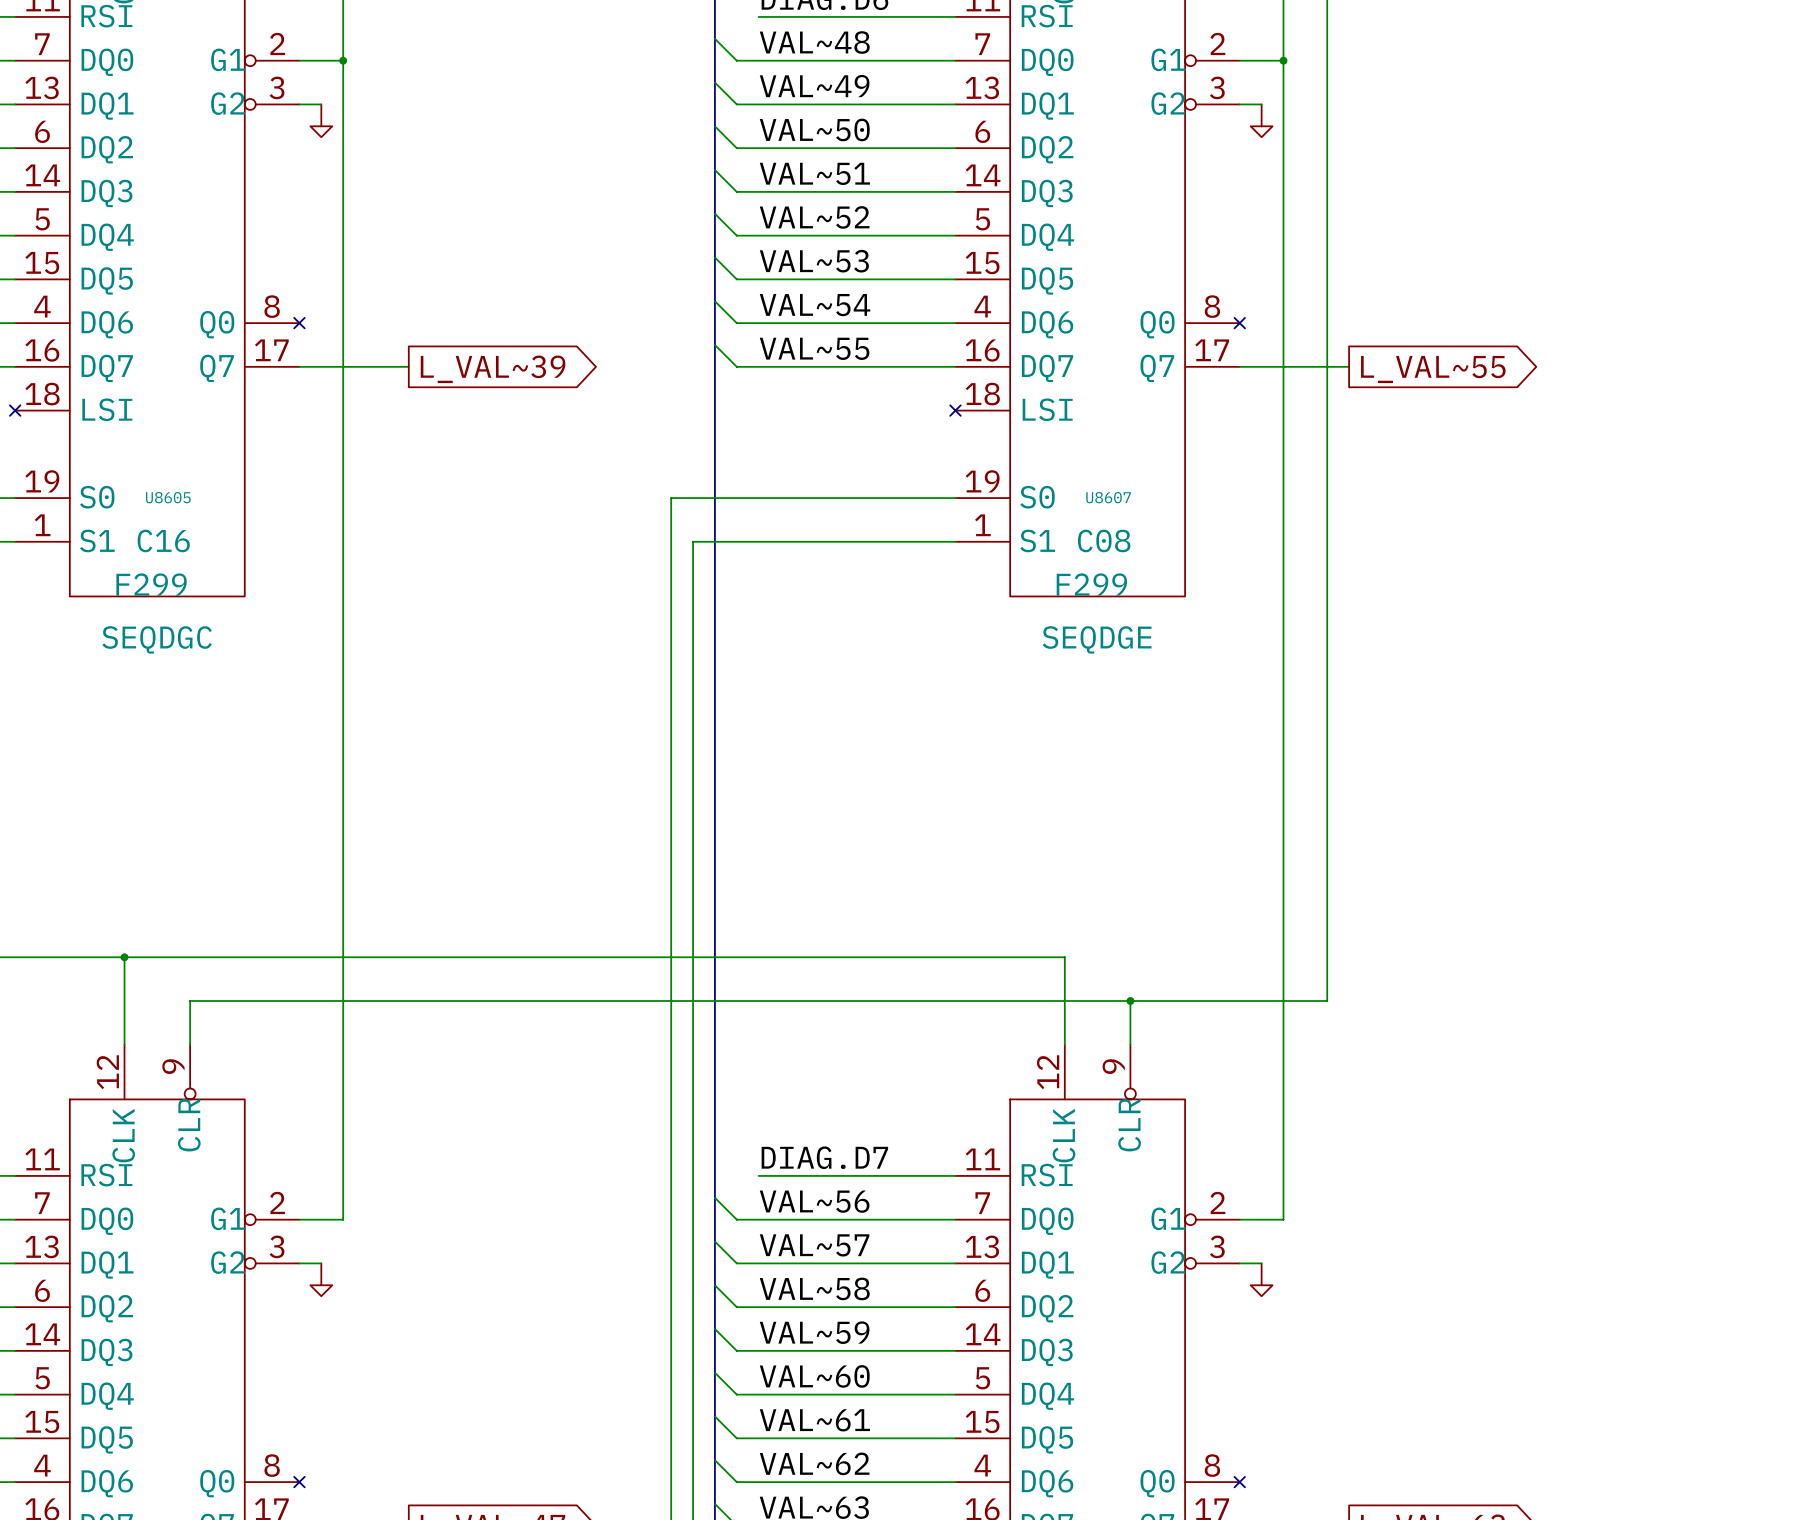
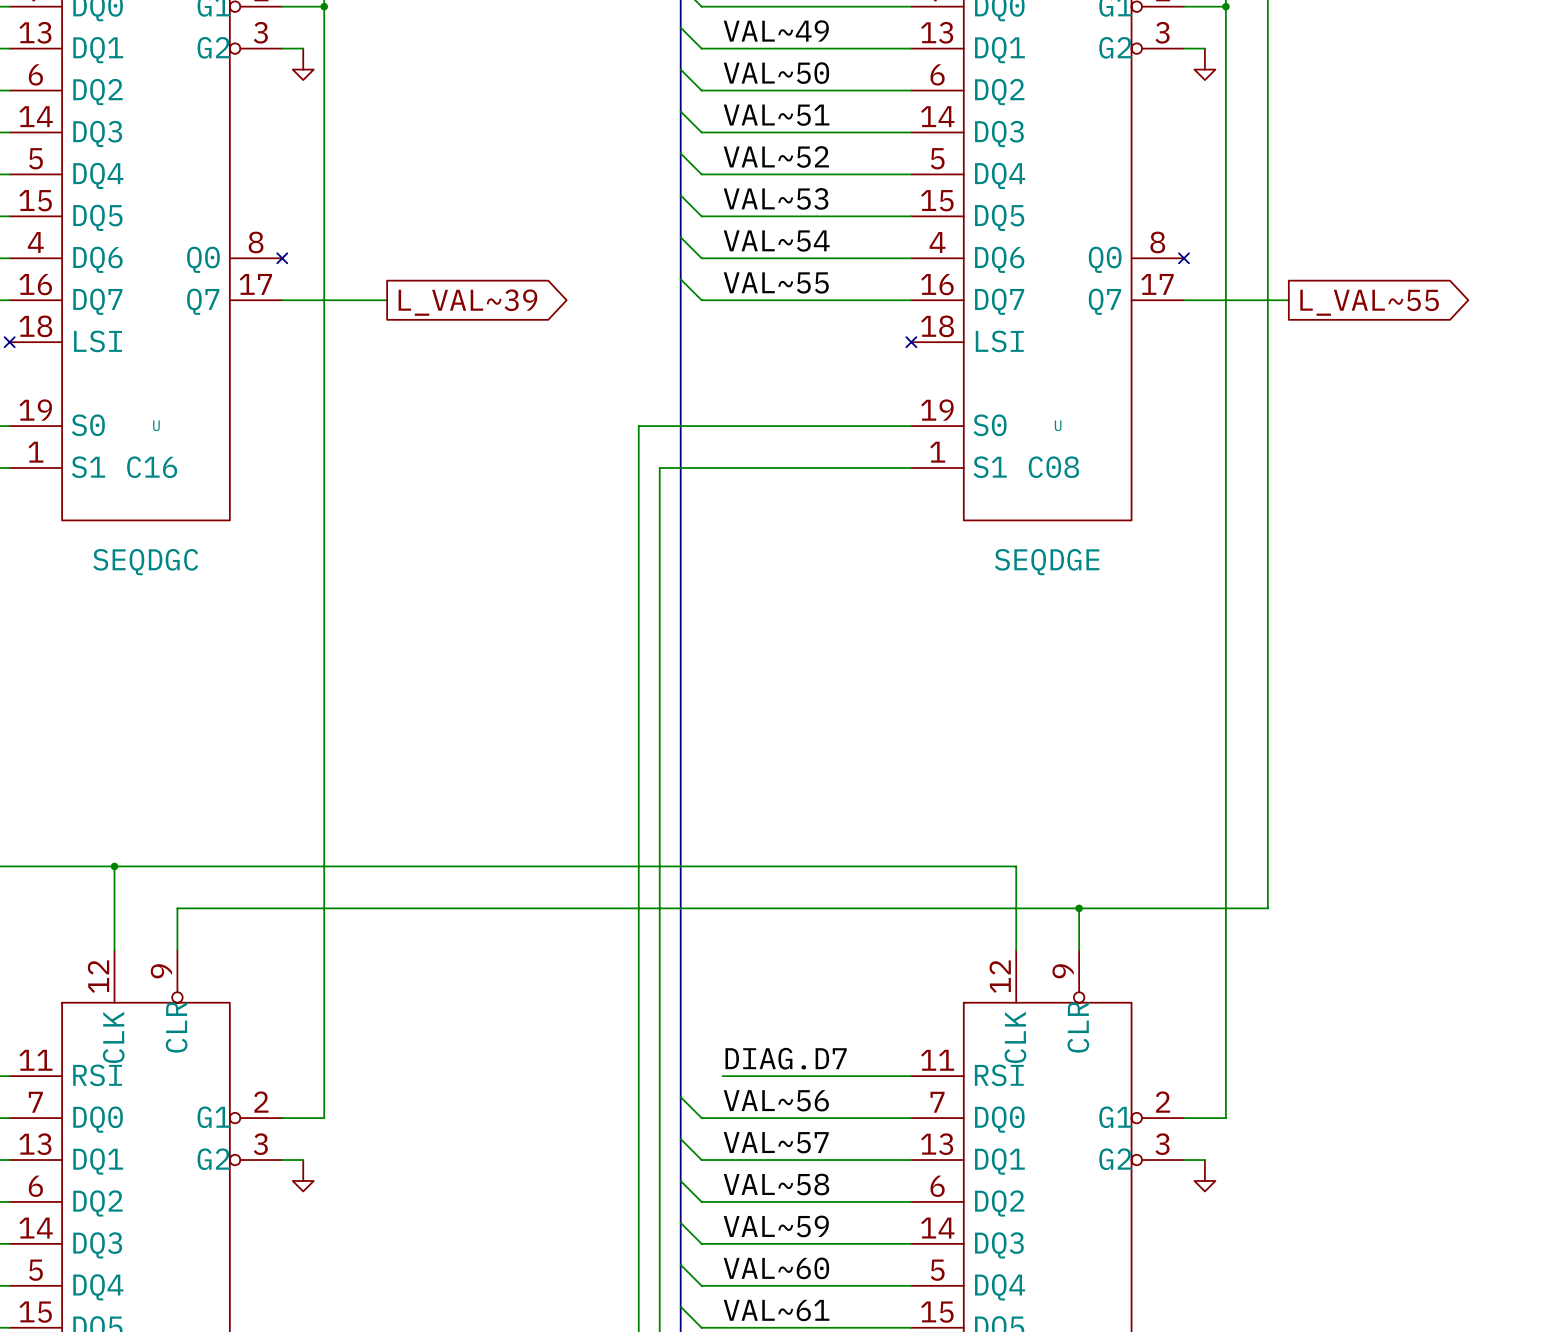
U8605 name: U8605 (168, 497) -> U (156, 425)
U8607 name: U8607 (1108, 497) -> U (1058, 425)
U8605 value: F299 (151, 584) -> none
U8607 value: F299 (1091, 584) -> none

